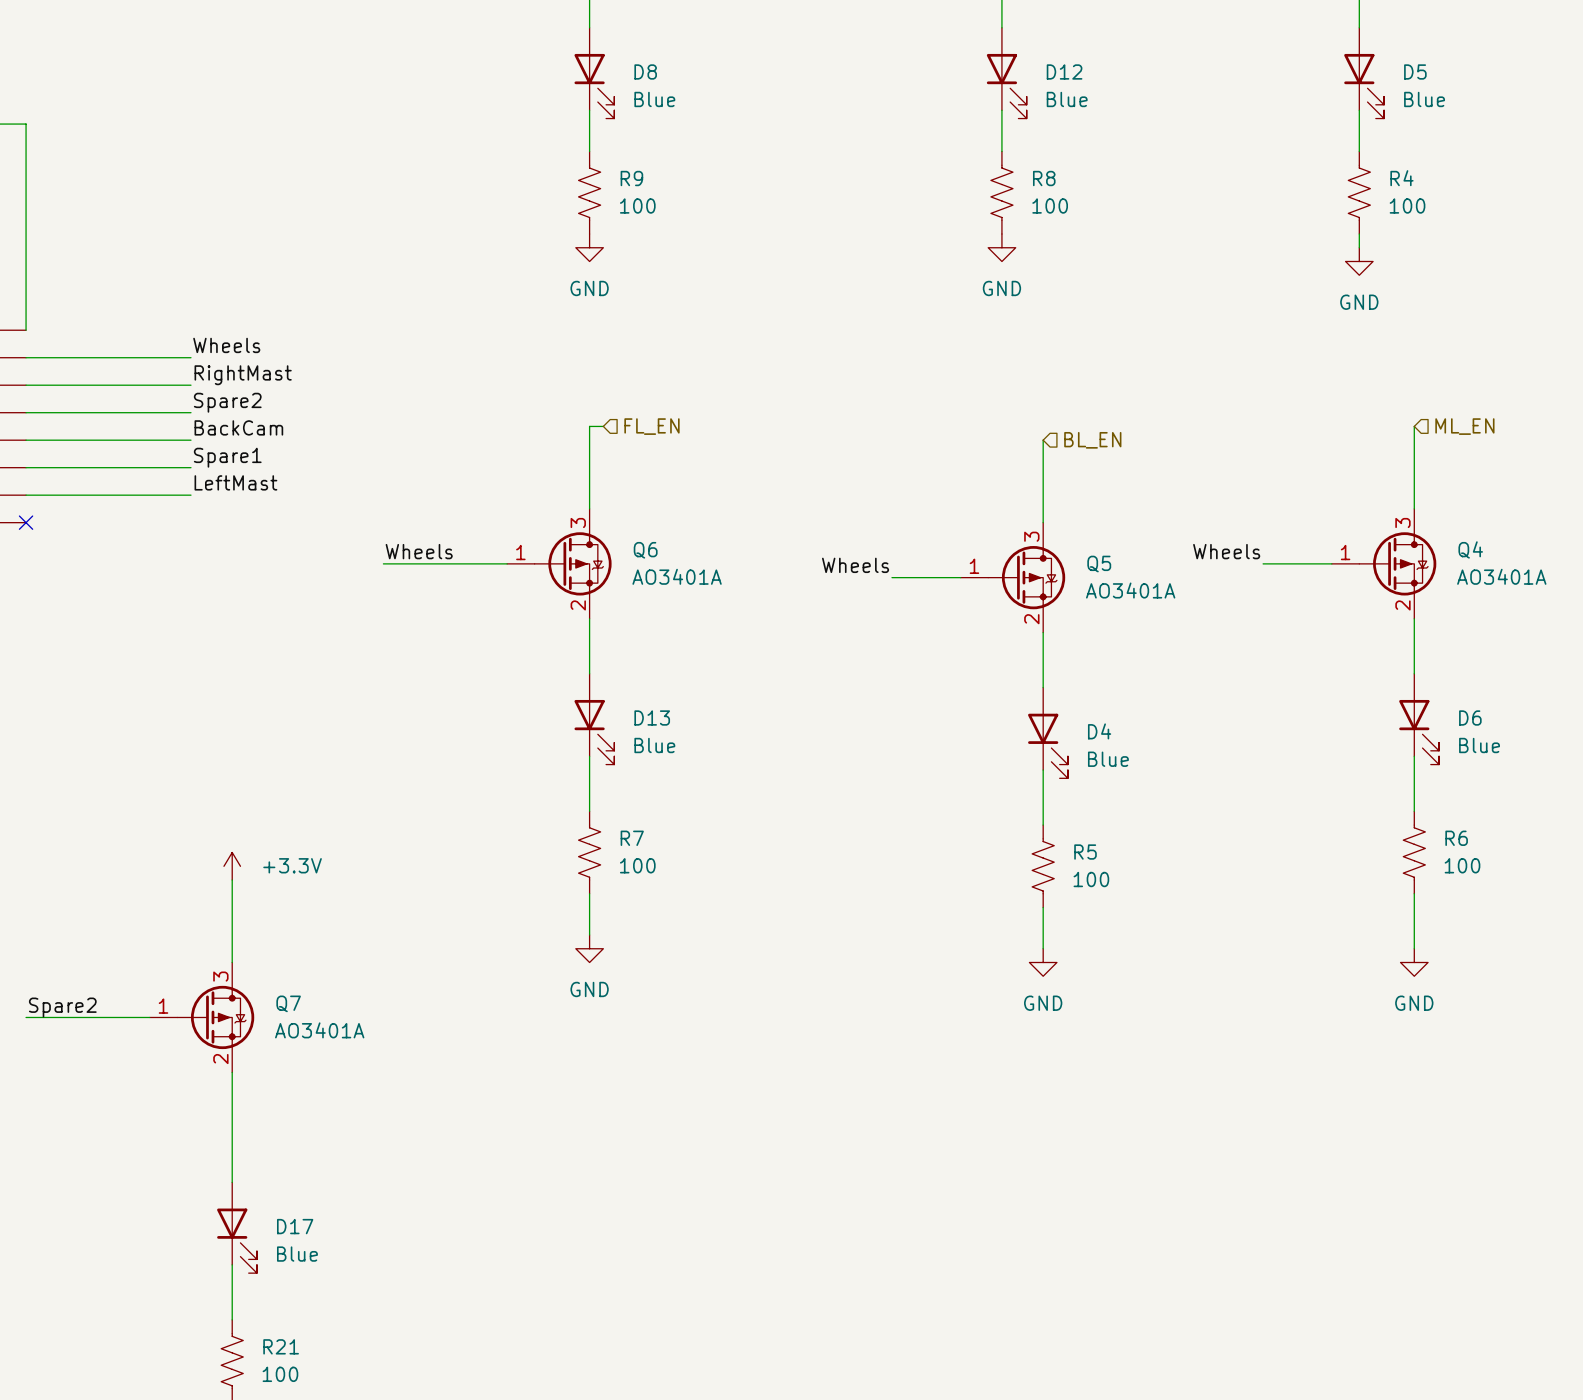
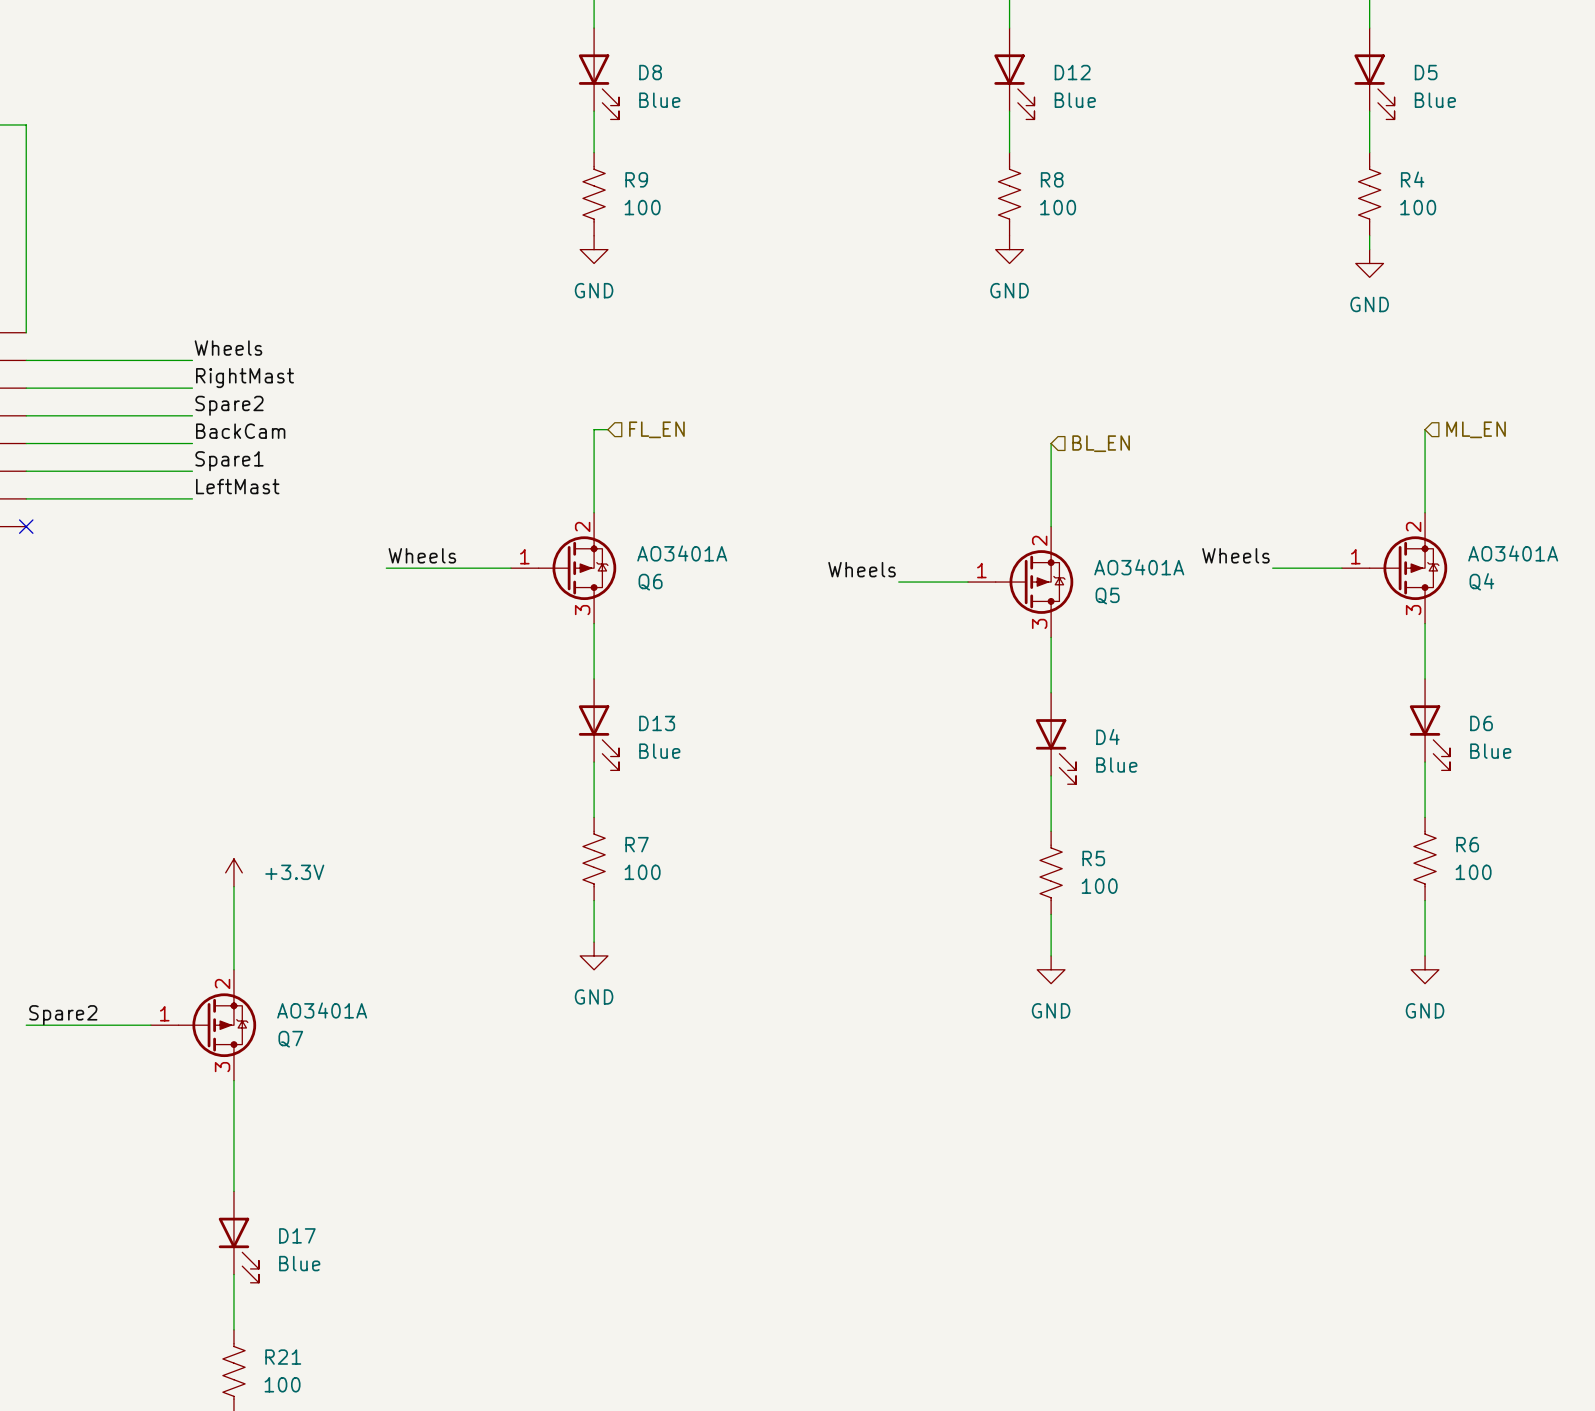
Q6 flip: as is (573, 563) -> up-down (577, 568)
Q4 flip: as is (1397, 563) -> up-down (1408, 568)
Q5 flip: as is (1026, 577) -> up-down (1034, 582)
Q7 flip: as is (215, 1017) -> up-down (217, 1025)

